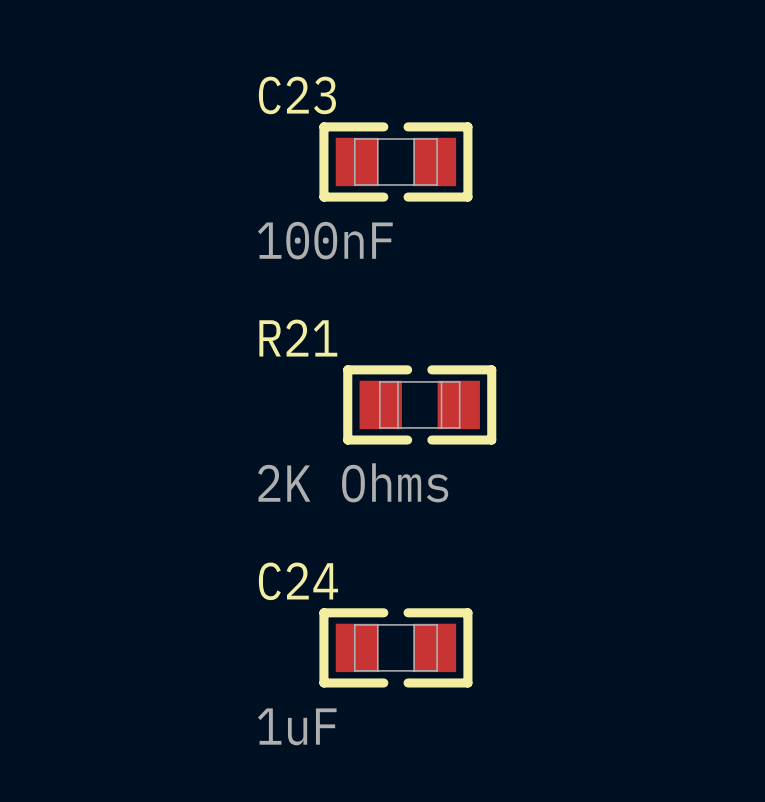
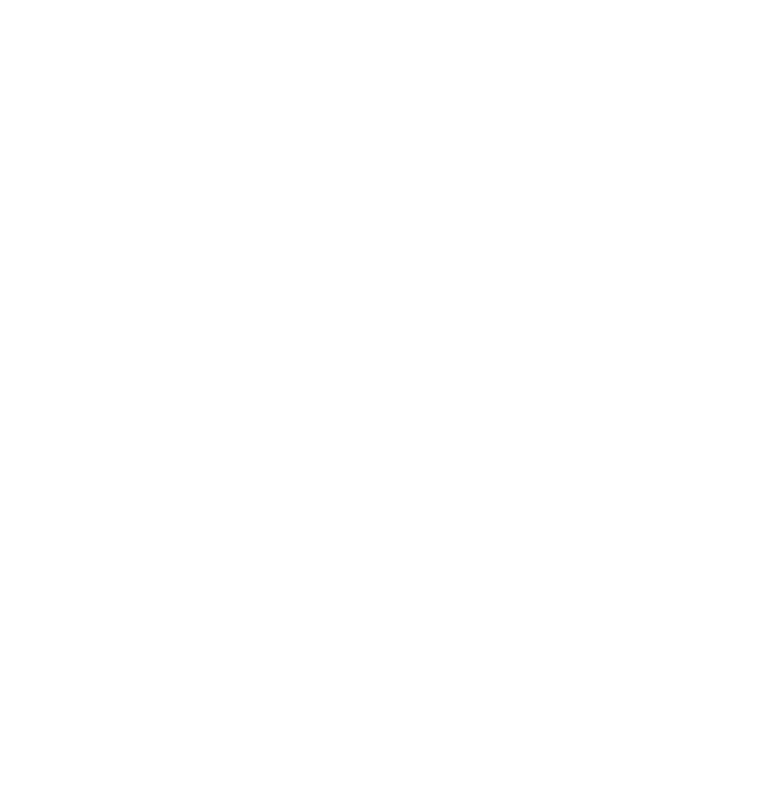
C23: 100nF (395, 161) -> none
R21: 2K Ohms (419, 404) -> none
C24: 1uF (395, 647) -> none

